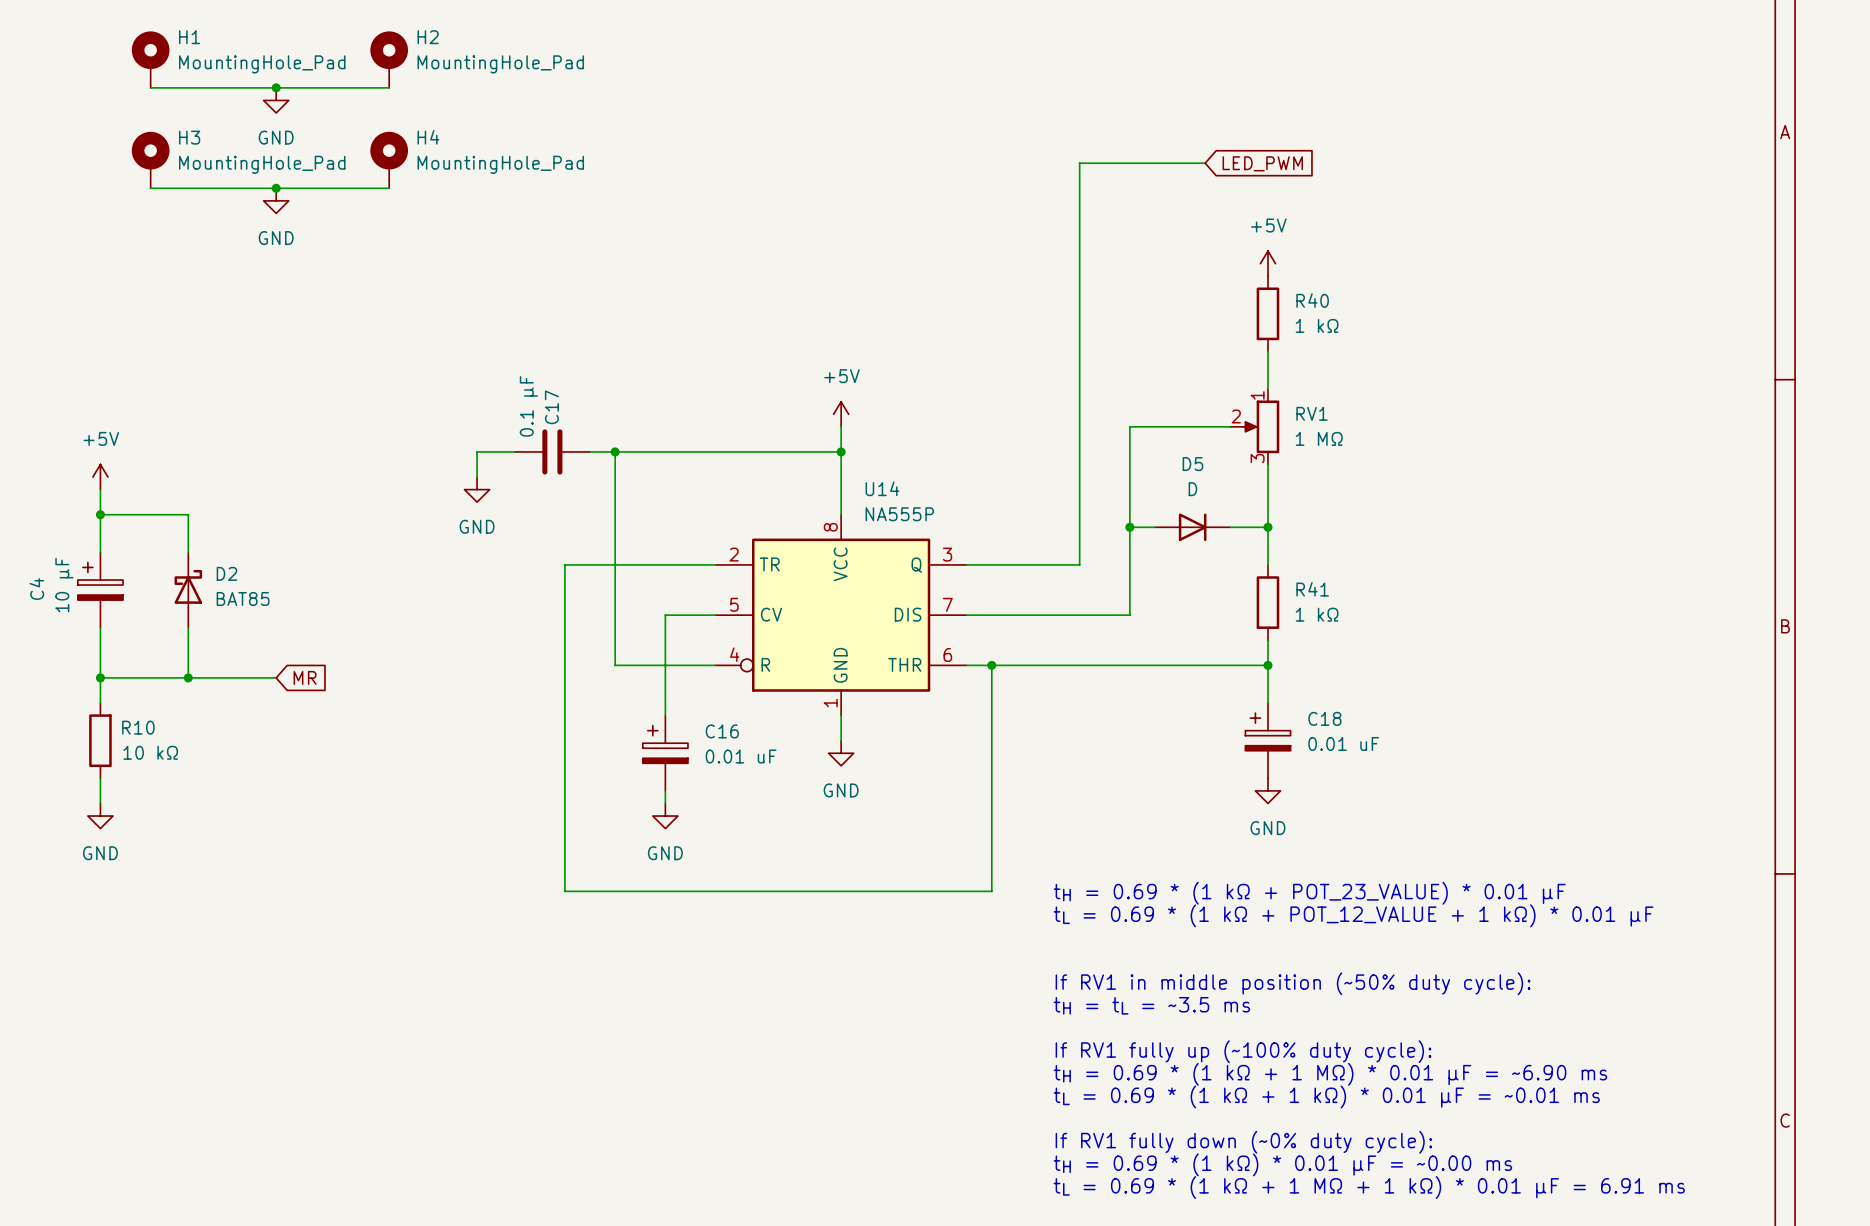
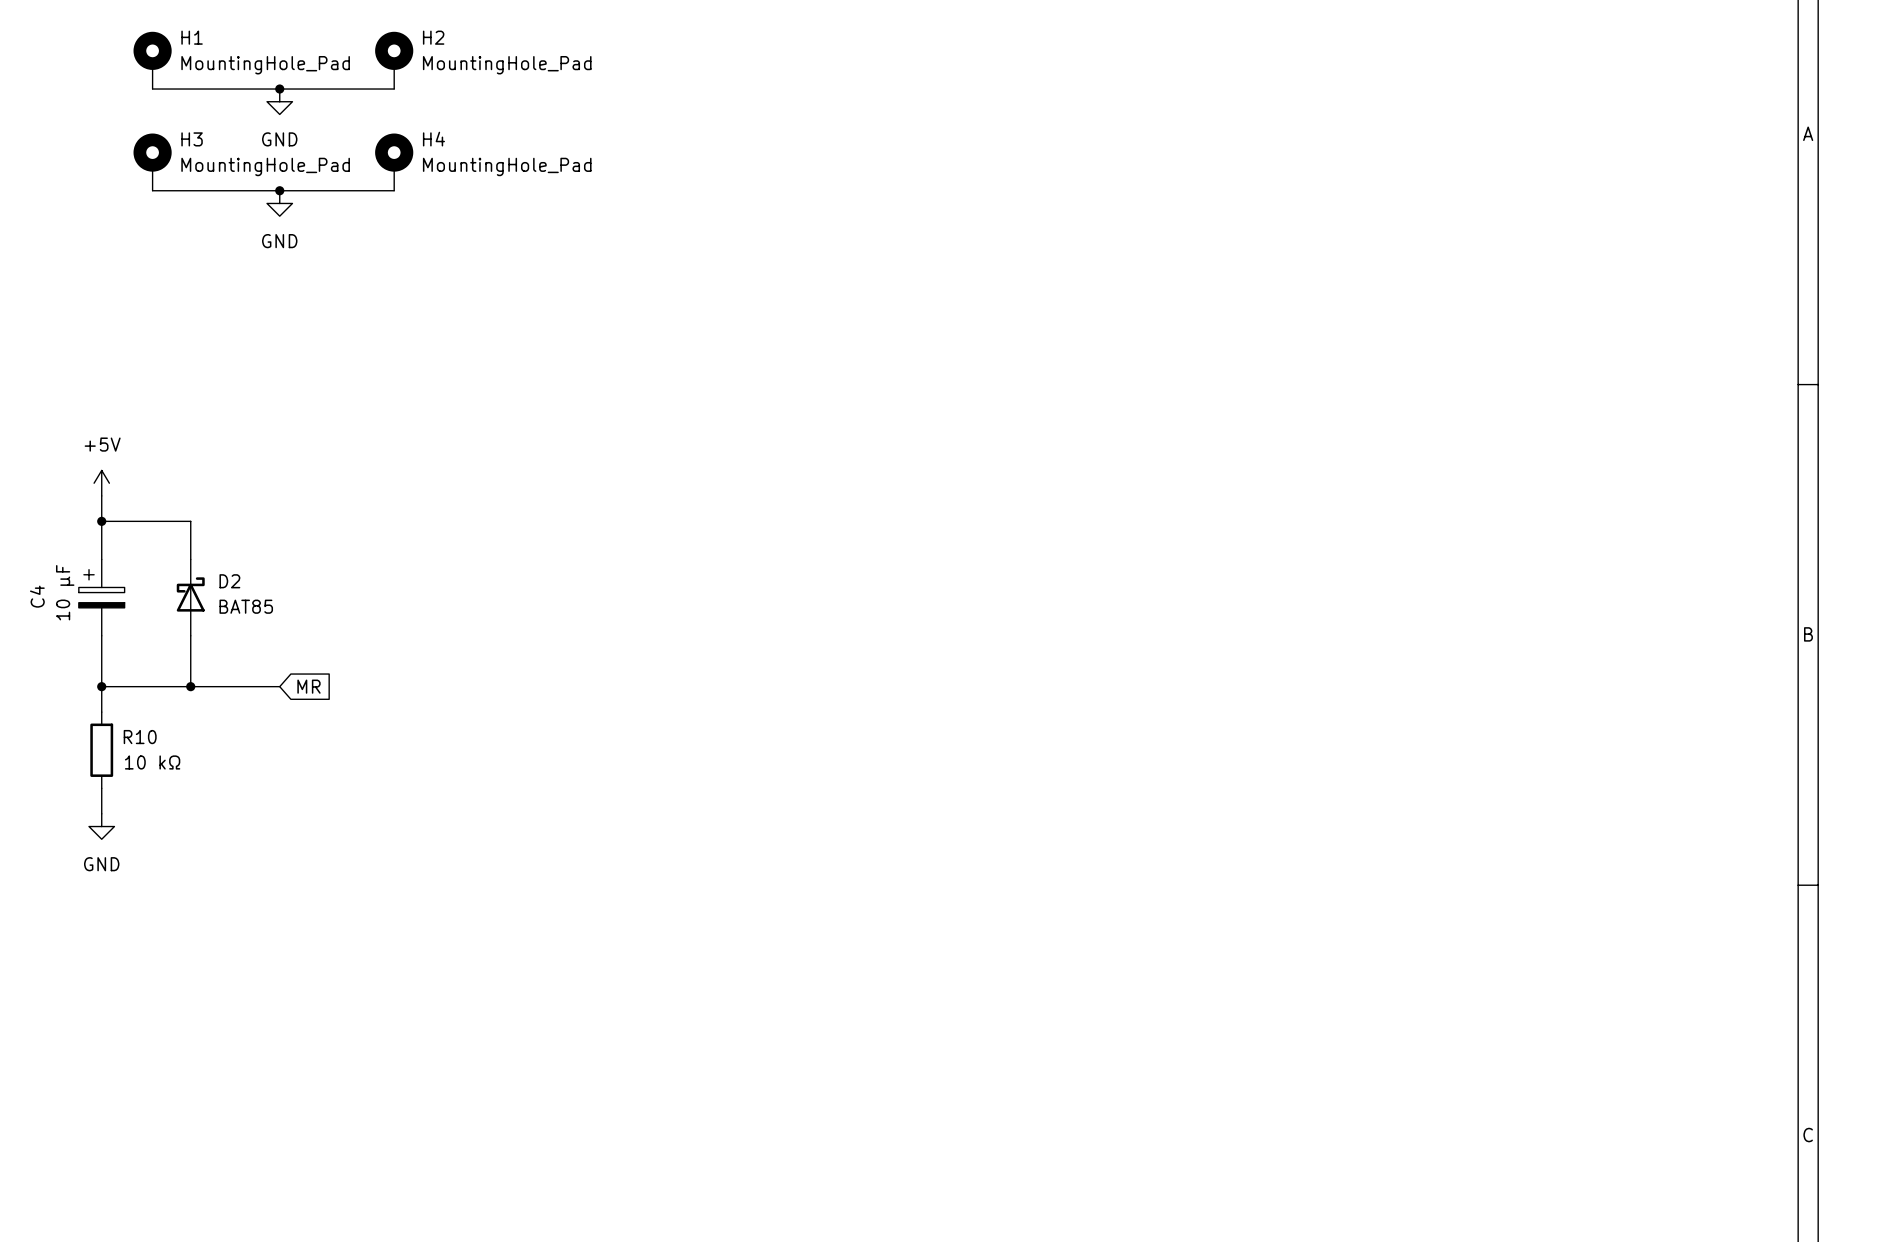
wire: (1205, 163) (1079, 163) (1079, 564) (966, 564) -> none
global label: LED_PWM (1262, 163) -> none
power symbol: +5V (1267, 263) -> none
R40: 1 kΩ (1267, 313) -> none
wire: (1267, 351) (1267, 389) -> none
power symbol: +5V (841, 414) -> none
wire: (841, 426) (841, 514) -> none
wire: (1230, 426) (1129, 426) (1129, 615) (966, 615) -> none
RV1: 1 MΩ (1254, 426) -> none
wire: (514, 451) (477, 451) (477, 477) -> none
C17: 0.1 µF (552, 451) -> none
wire: (590, 451) (841, 451) -> none
wire: (615, 451) (615, 665) (715, 665) -> none
junction: (615, 451) -> none
junction: (841, 451) -> none
wire: (1267, 464) (1267, 564) -> none
power symbol: GND (477, 489) -> none
wire: (1129, 527) (1154, 527) -> none
junction: (1129, 527) -> none
D5: D (1192, 527) -> none
wire: (1230, 527) (1267, 527) -> none
junction: (1267, 527) -> none
wire: (715, 564) (564, 564) (564, 891) (991, 891) (991, 665) -> none
R41: 1 kΩ (1267, 602) -> none
wire: (715, 615) (665, 615) (665, 715) -> none
U14: NA555P (841, 615) -> none
wire: (1267, 640) (1267, 703) -> none
wire: (966, 665) (1267, 665) -> none
junction: (991, 665) -> none
junction: (1267, 665) -> none
wire: (841, 715) (841, 740) -> none
C18: 0.01 uF (1267, 740) -> none
C16: 0.01 uF (665, 753) -> none
power symbol: GND (841, 753) -> none
wire: (665, 790) (665, 803) -> none
power symbol: GND (1267, 790) -> none
power symbol: GND (665, 816) -> none
text: tH = 0.69 * (1 kΩ + POT_23_VALUE) * 0.01 µF (1309, 893) -> none
text: tL = 0.69 * (1 kΩ + POT_12_VALUE + 1 kΩ) * 0.01 µF (1353, 915) -> none
text: If RV1 in middle position (~50% duty cycle): (1293, 983) -> none
text: tH = tL = ~3.5 ms (1151, 1005) -> none
text: If RV1 fully up (~100% duty cycle): (1243, 1051) -> none
text: tH = 0.69 * (1 kΩ + 1 MΩ) * 0.01 µF = ~6.90 ms (1330, 1074) -> none
text: tL = 0.69 * (1 kΩ + 1 kΩ) * 0.01 µF = ~0.01 ms (1326, 1096) -> none
text: If RV1 fully down (~0% duty cycle): (1243, 1142) -> none
text: tH = 0.69 * (1 kΩ) * 0.01 µF = ~0.00 ms (1282, 1164) -> none
text: tL = 0.69 * (1 kΩ + 1 MΩ + 1 kΩ) * 0.01 µF = 6.91 ms (1369, 1187) -> none

